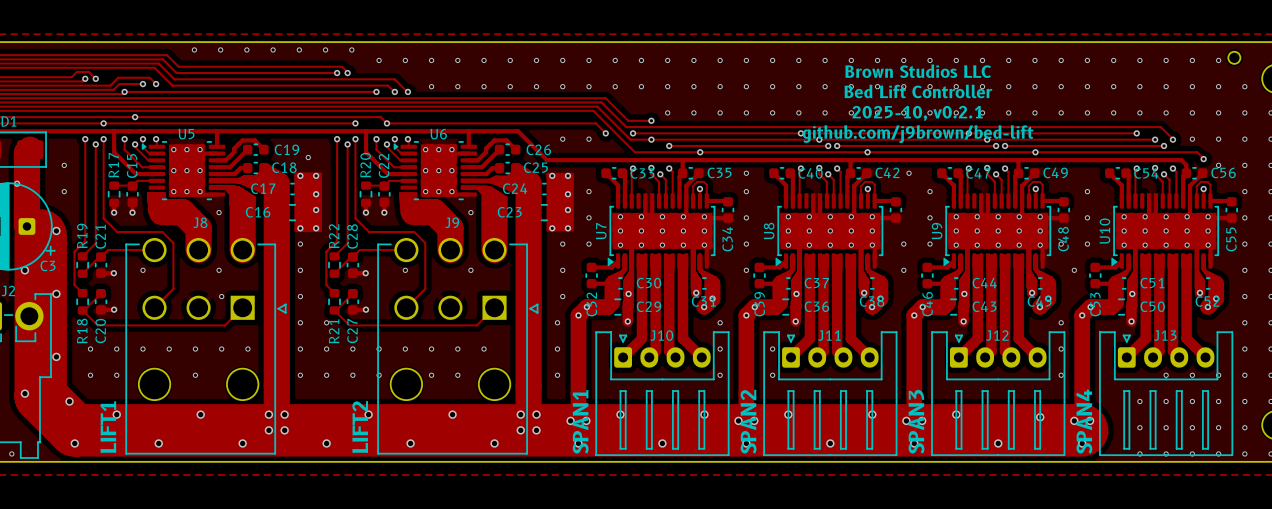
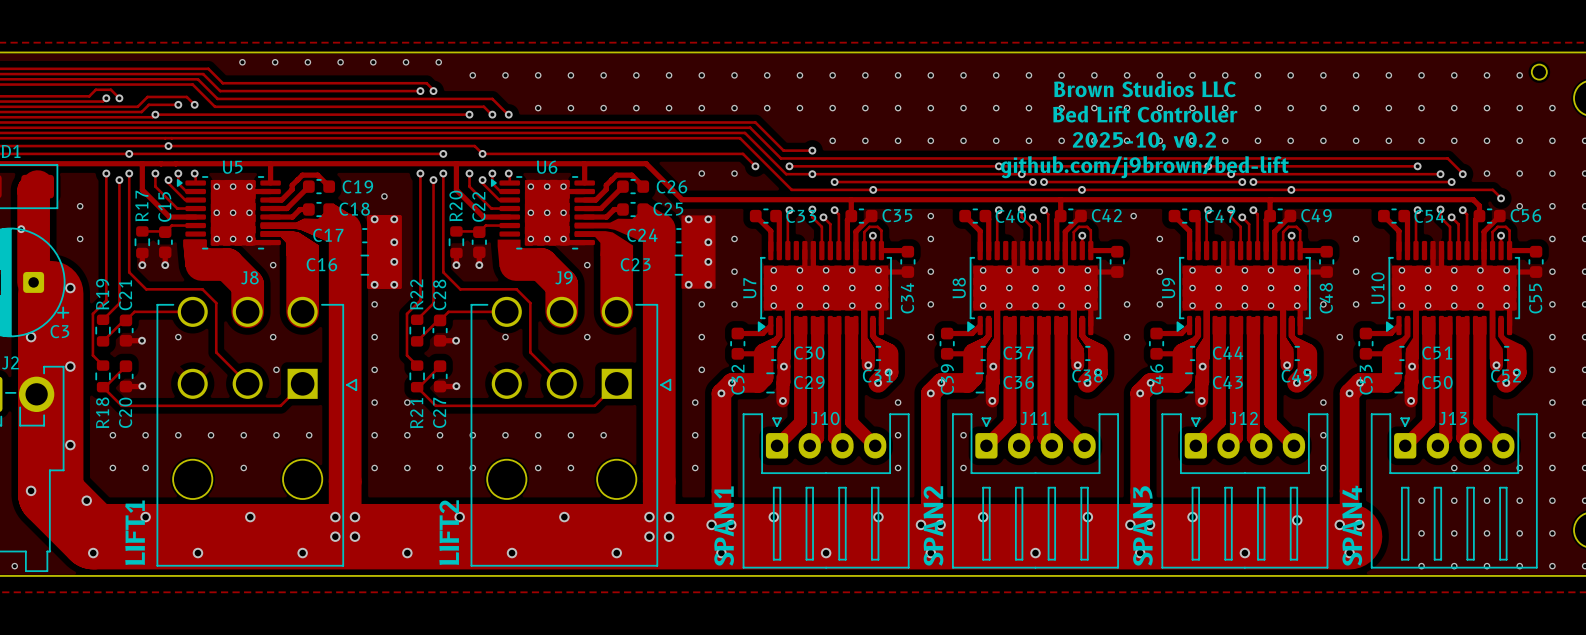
text: 2025-10, v0.2.1 (917, 113) -> 2025-10, v0.2 (1144, 141)
track: (173, 282) (173, 288) (154, 307) -> (216, 352) (247, 383)
track: (425, 282) (425, 288) (406, 307) -> (530, 352) (561, 383)

